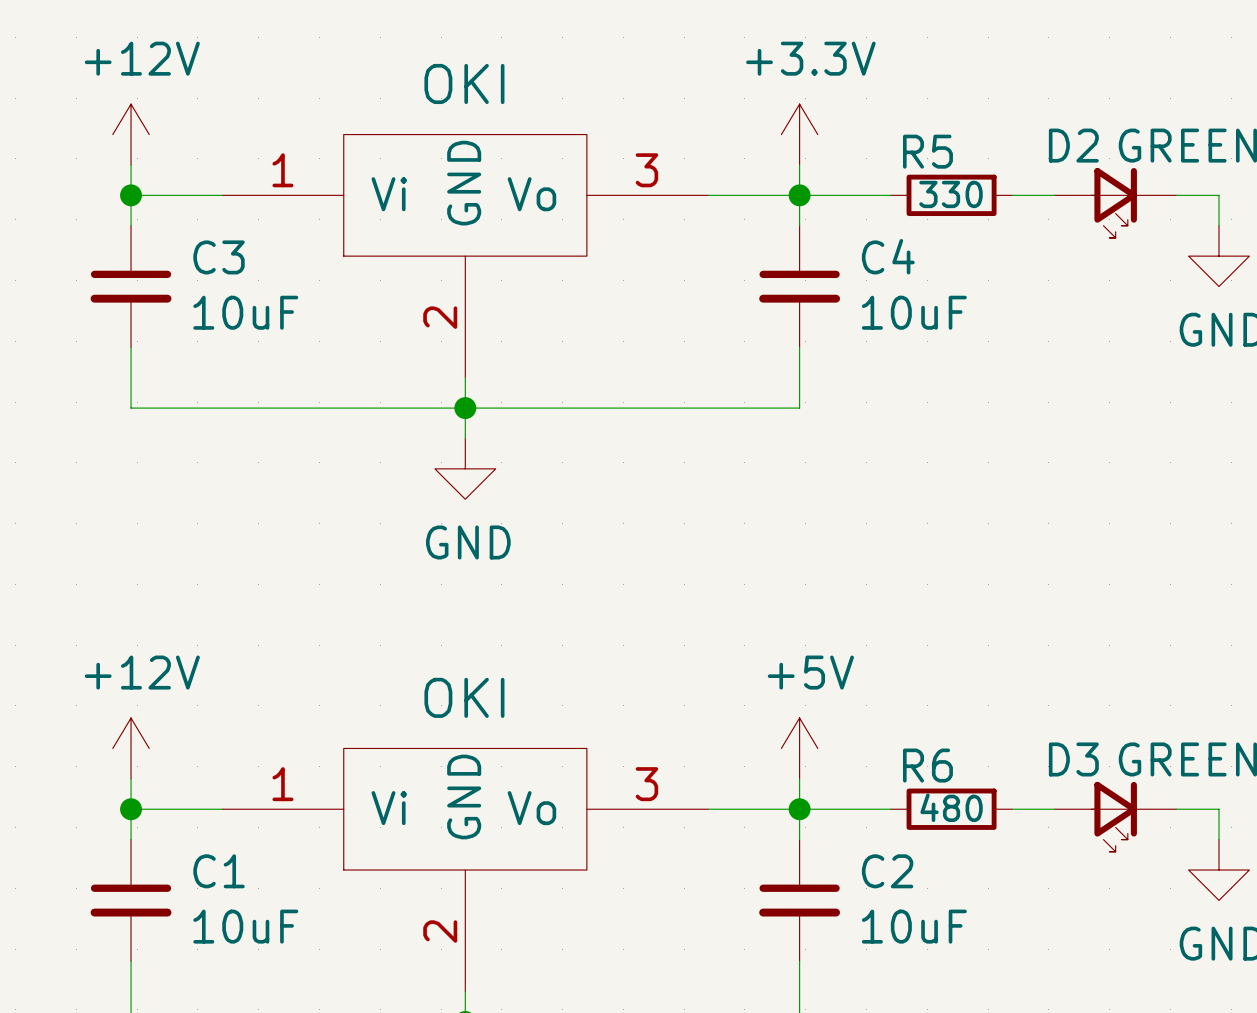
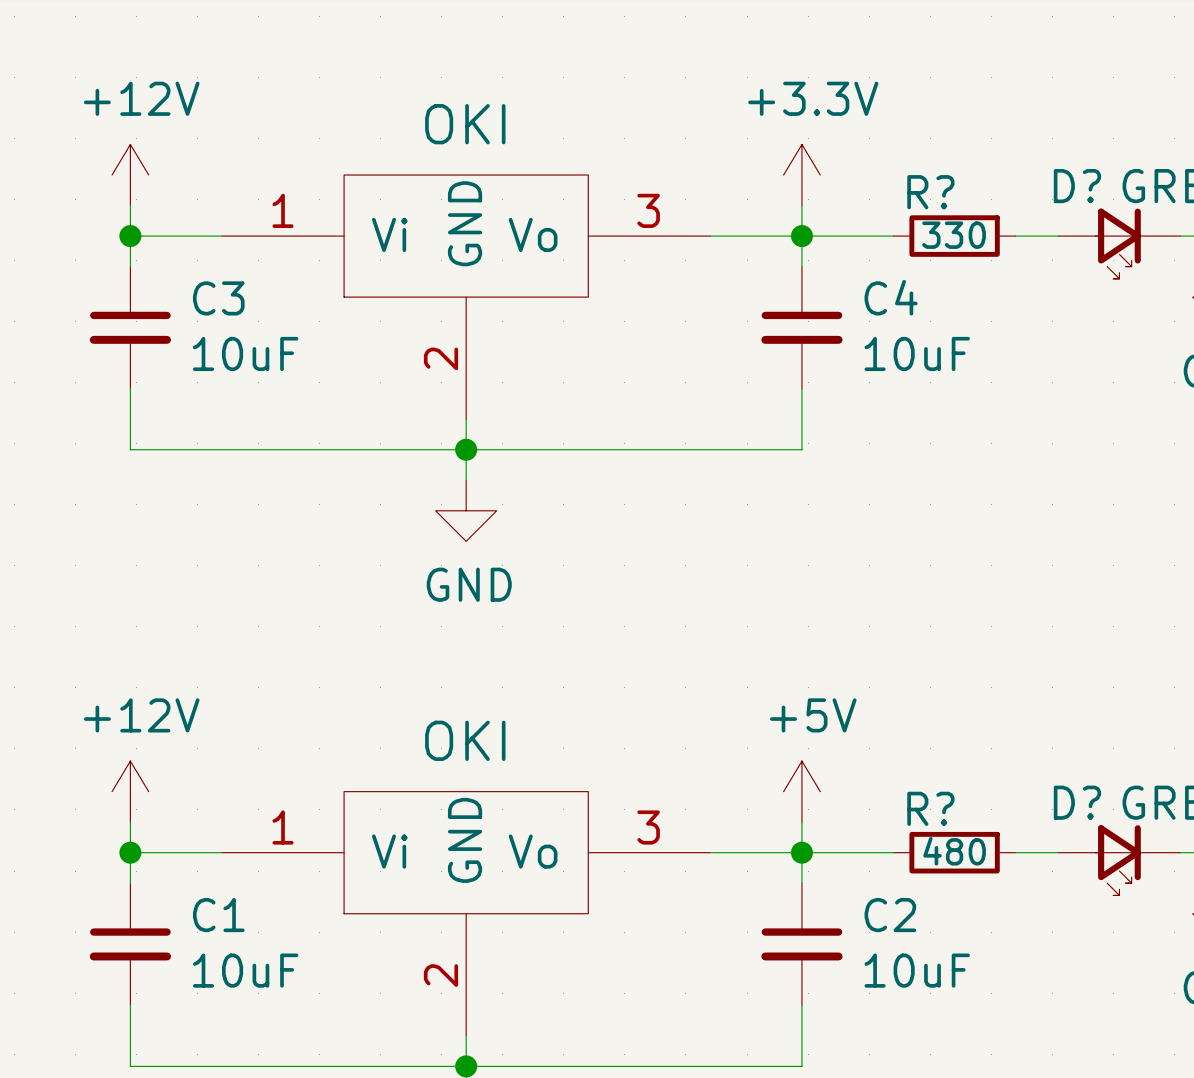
D2 name: D2 (1073, 145) -> D? (1077, 186)
R5 name: R5 (927, 151) -> R? (930, 192)
D3 name: D3 (1073, 759) -> D? (1077, 802)
R6 name: R6 (927, 765) -> R? (930, 808)

